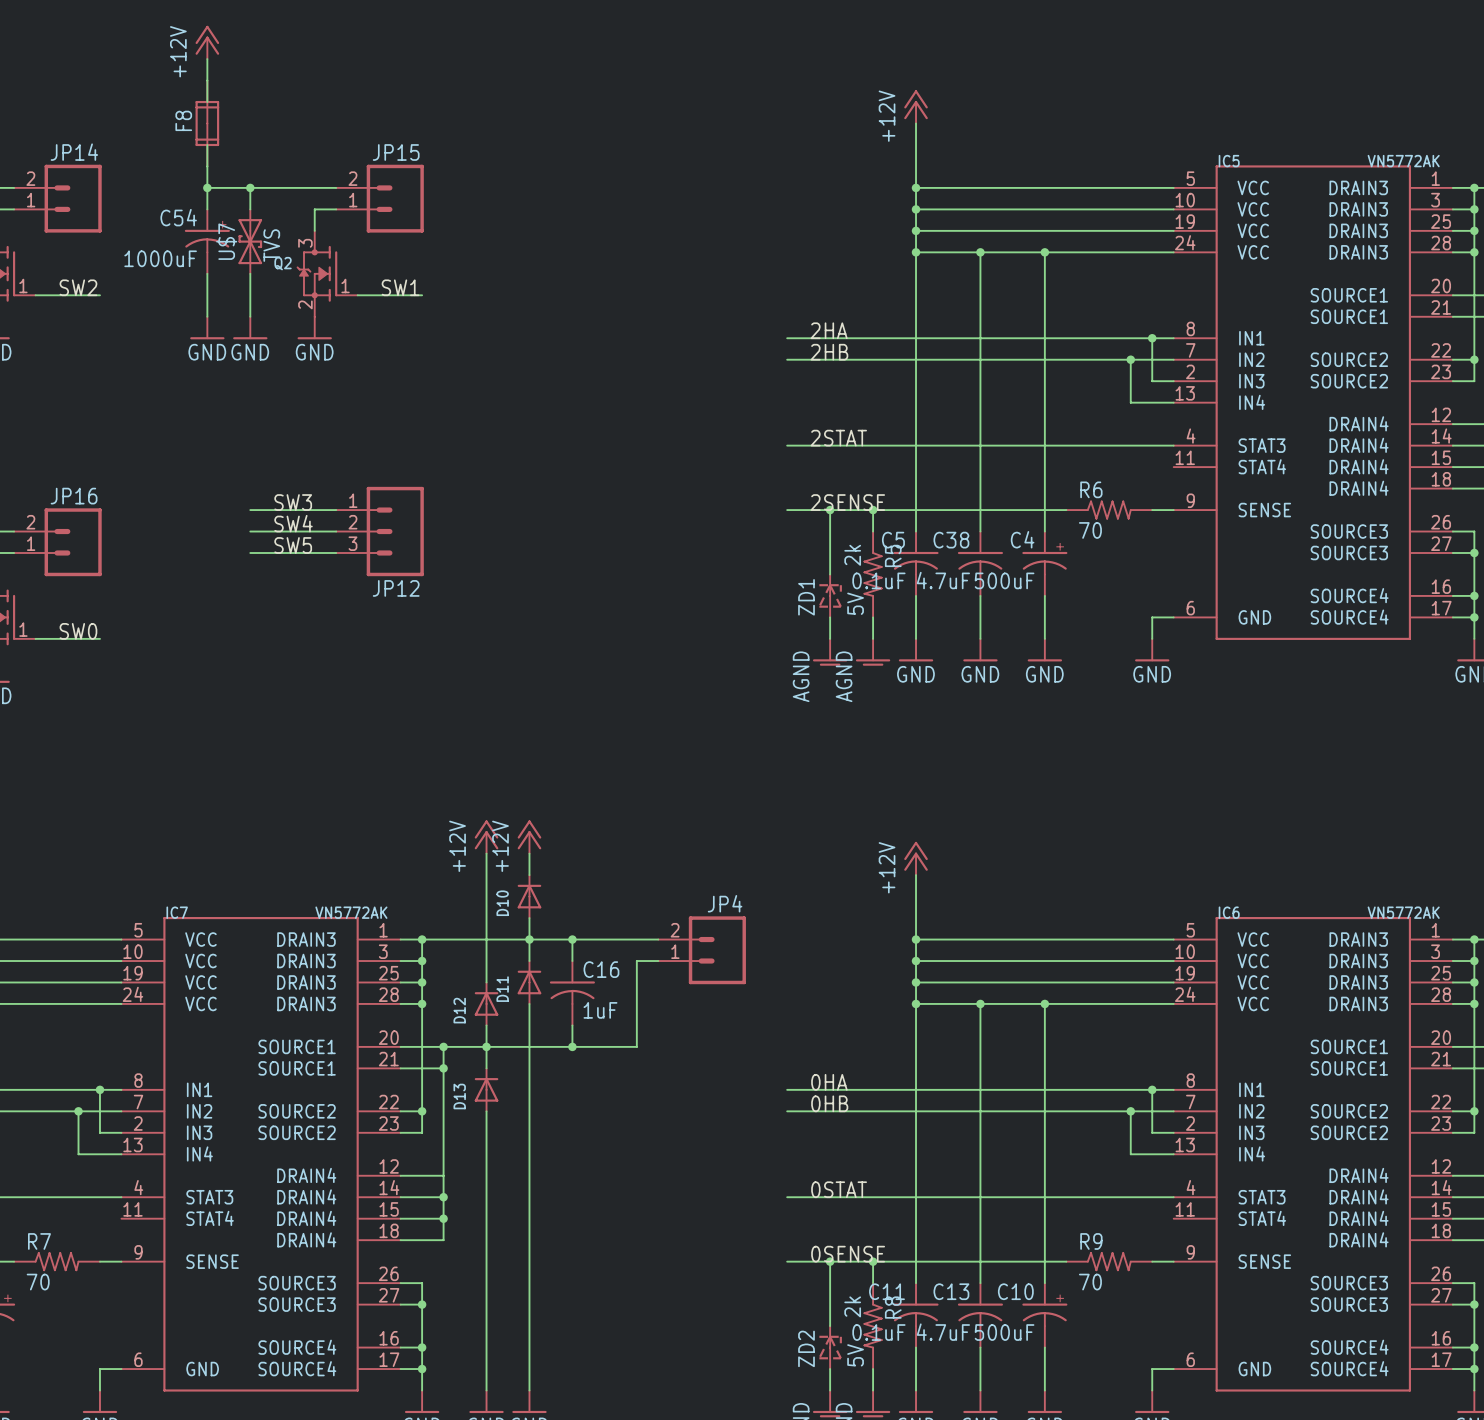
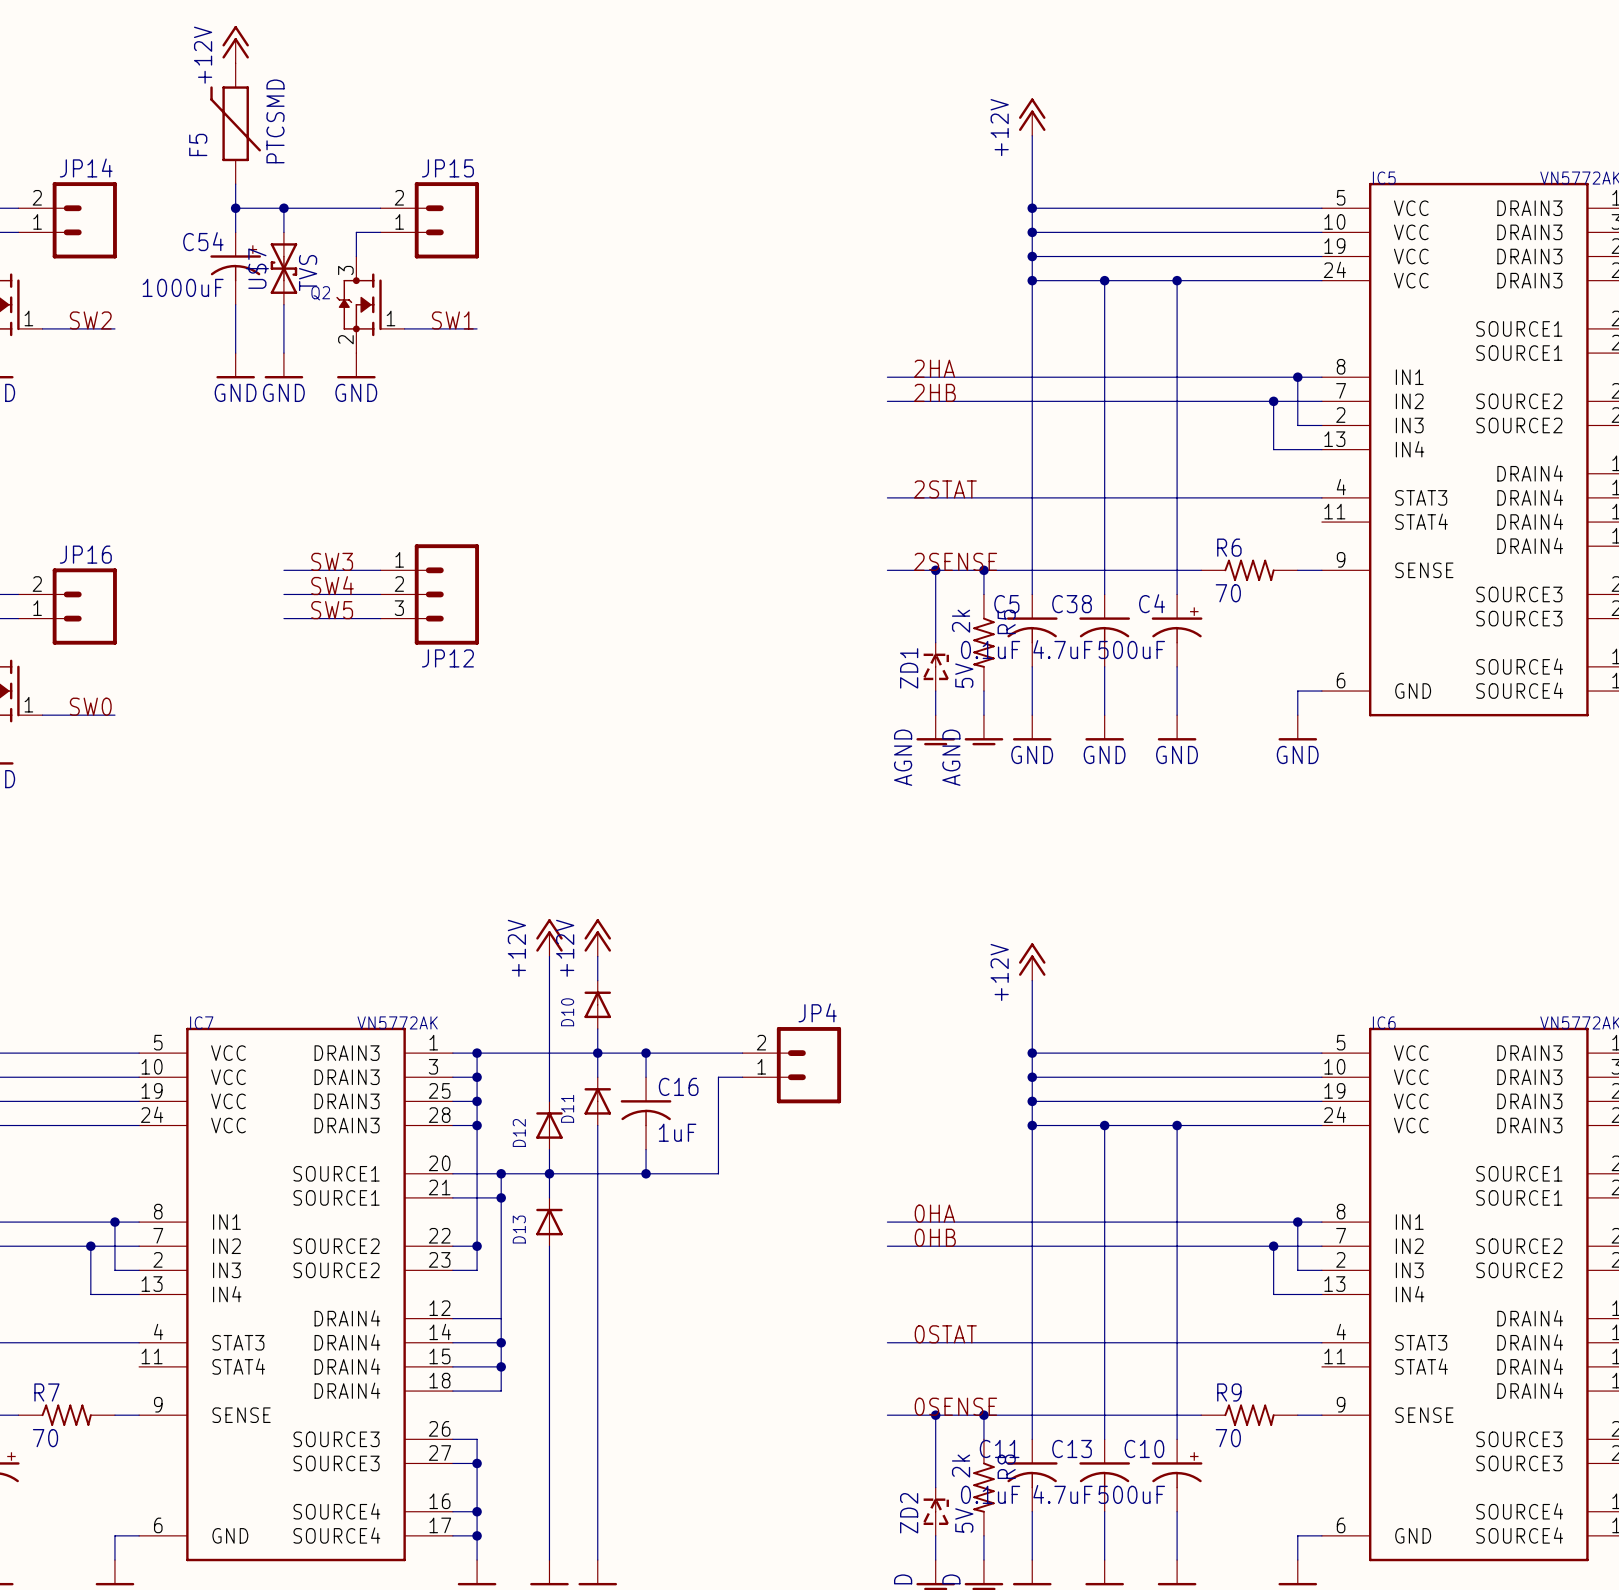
F5: none -> PTCSMD (235, 123)
F8: (207, 123) -> none

